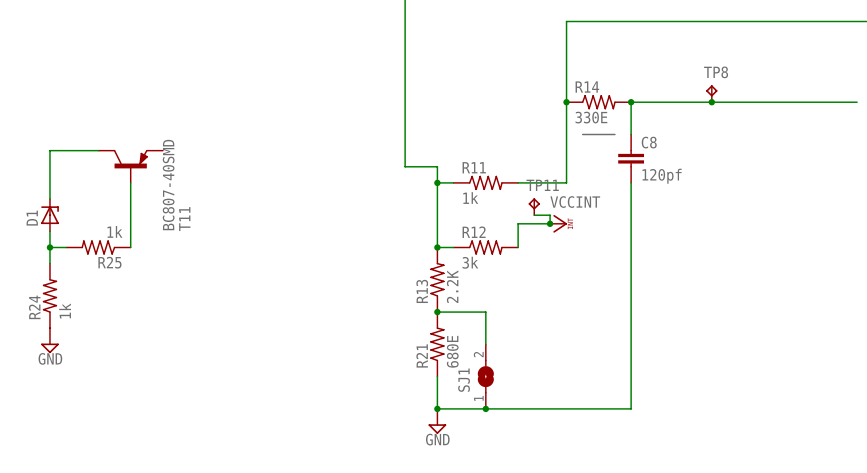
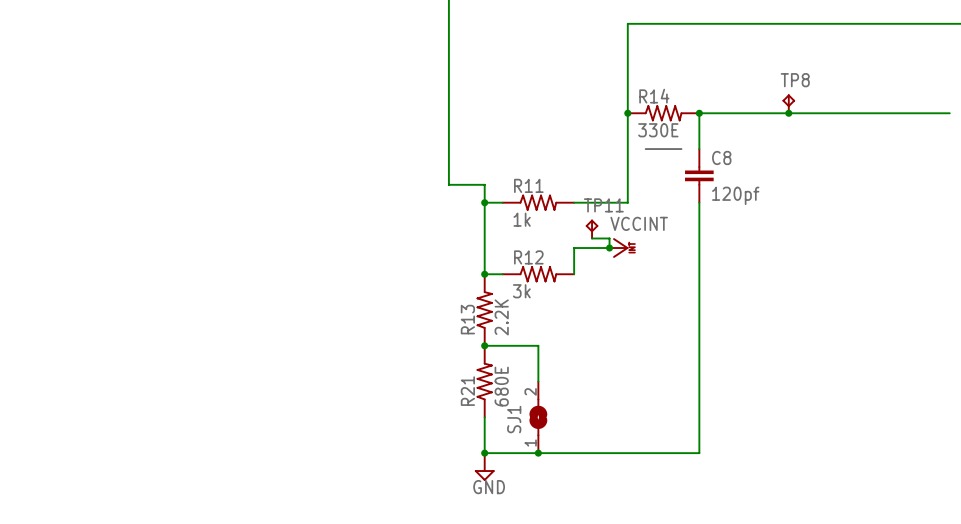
wire: (98, 150) (49, 150) (49, 199) -> none
T11: BC807-40SMD (130, 166) -> none
wire: (130, 182) (130, 247) -> none
D1: (49, 215) -> none
wire: (49, 231) (49, 263) -> none
wire: (49, 247) (66, 247) -> none
junction: (49, 247) -> none
R25: 1k (98, 247) -> none
R24: 1k (49, 295) -> none
power symbol: GND (49, 340) -> none

